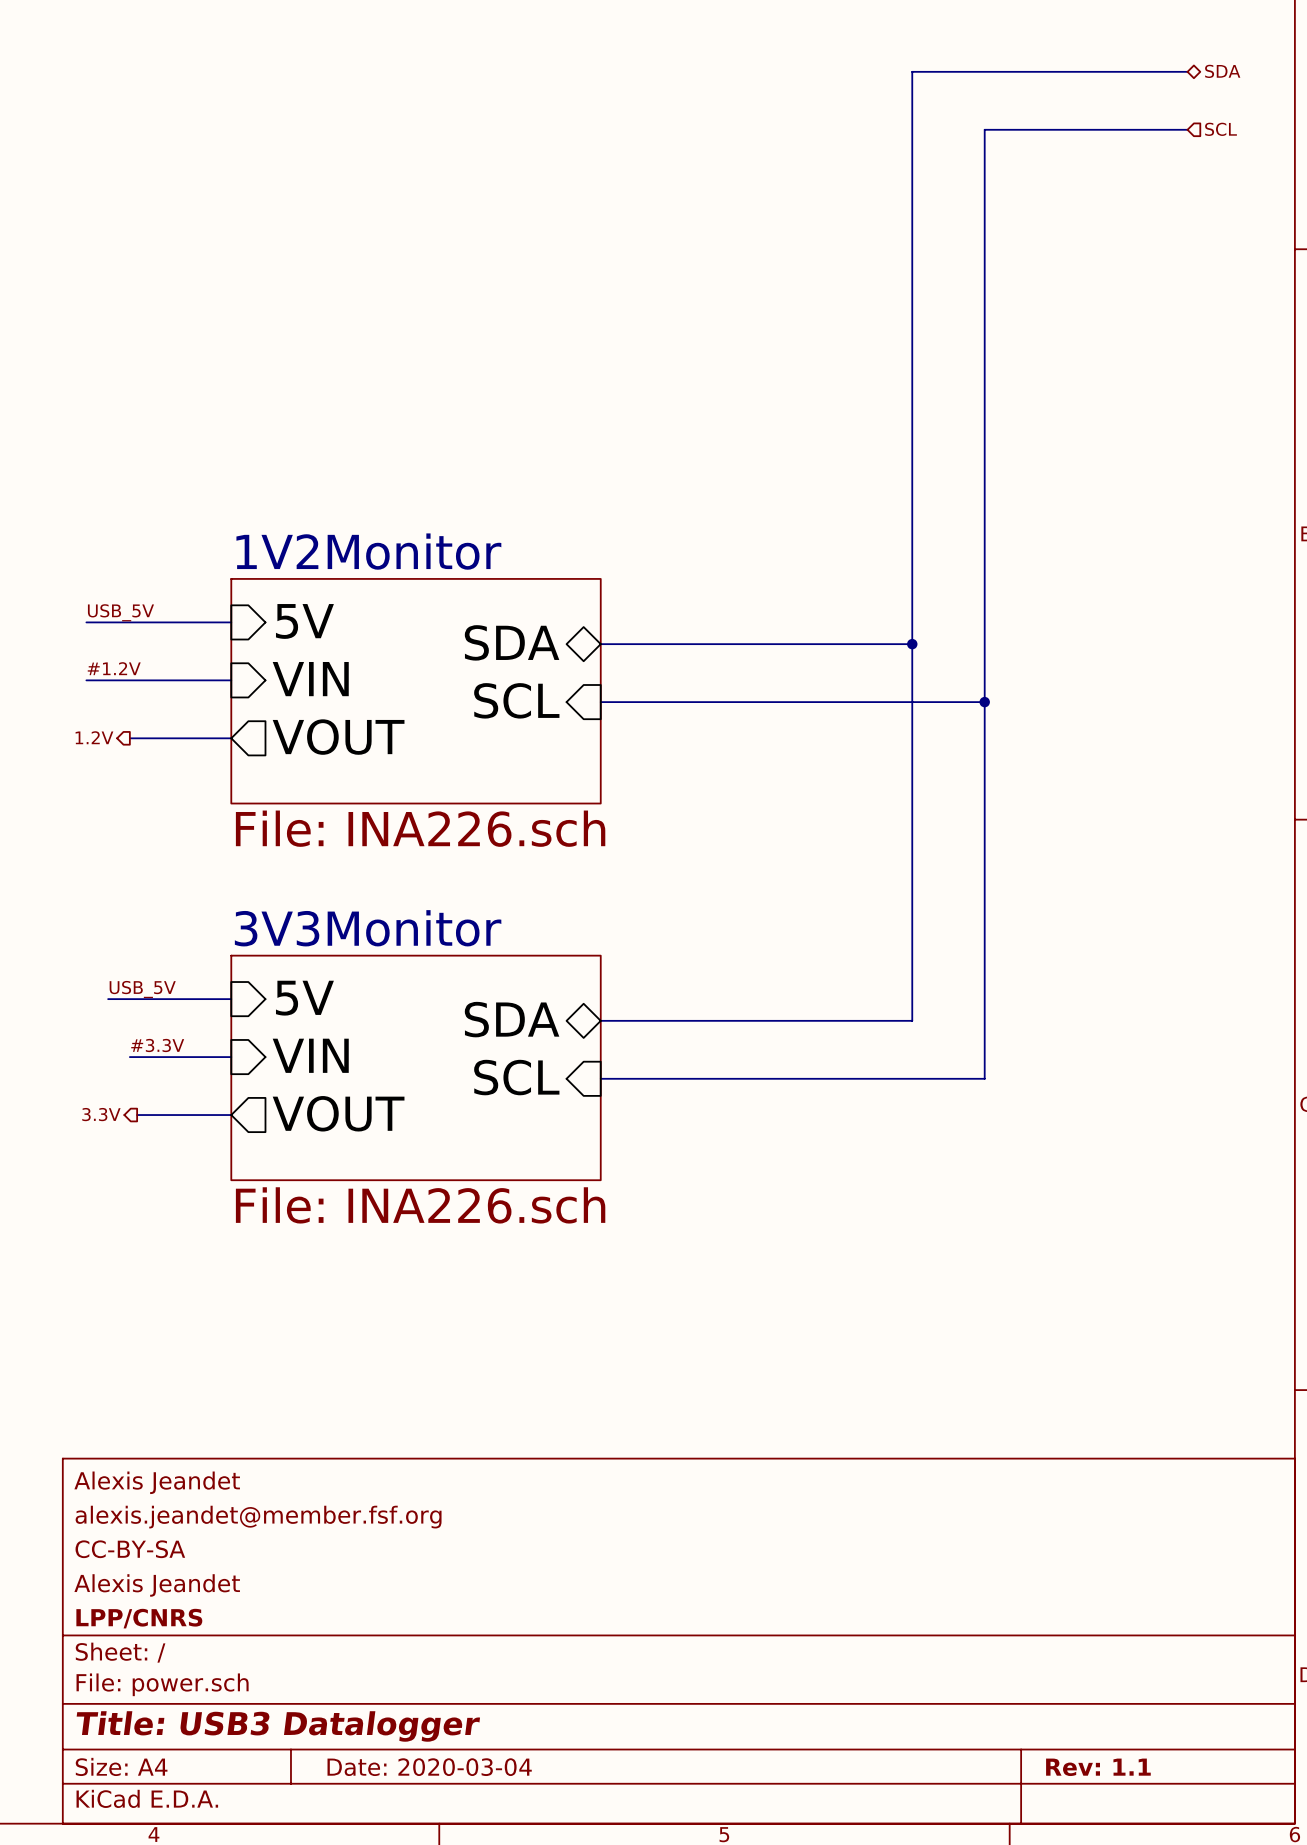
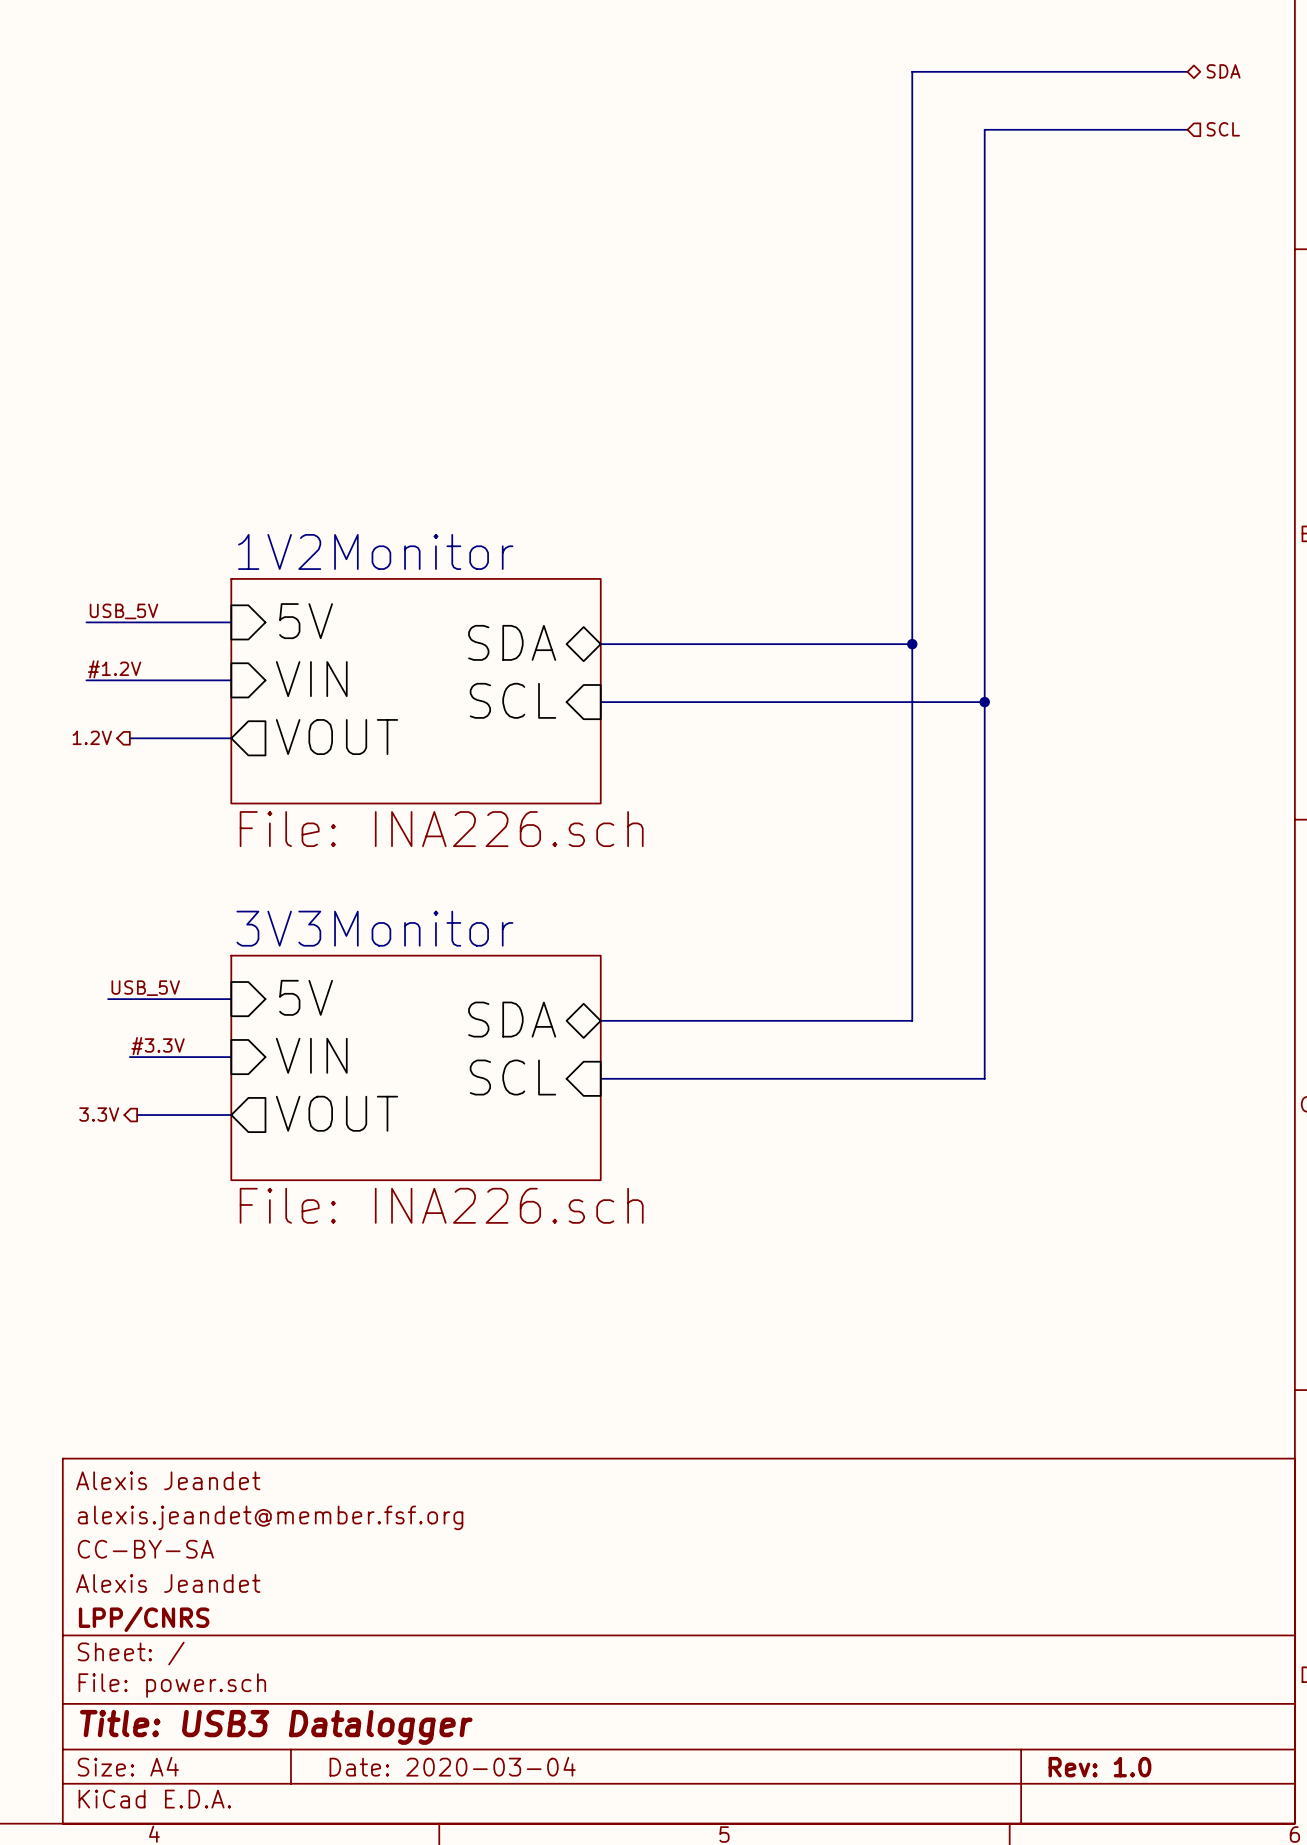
title block: Rev: 1.1 (1098, 1767) -> Rev: 1.0 (1099, 1767)

